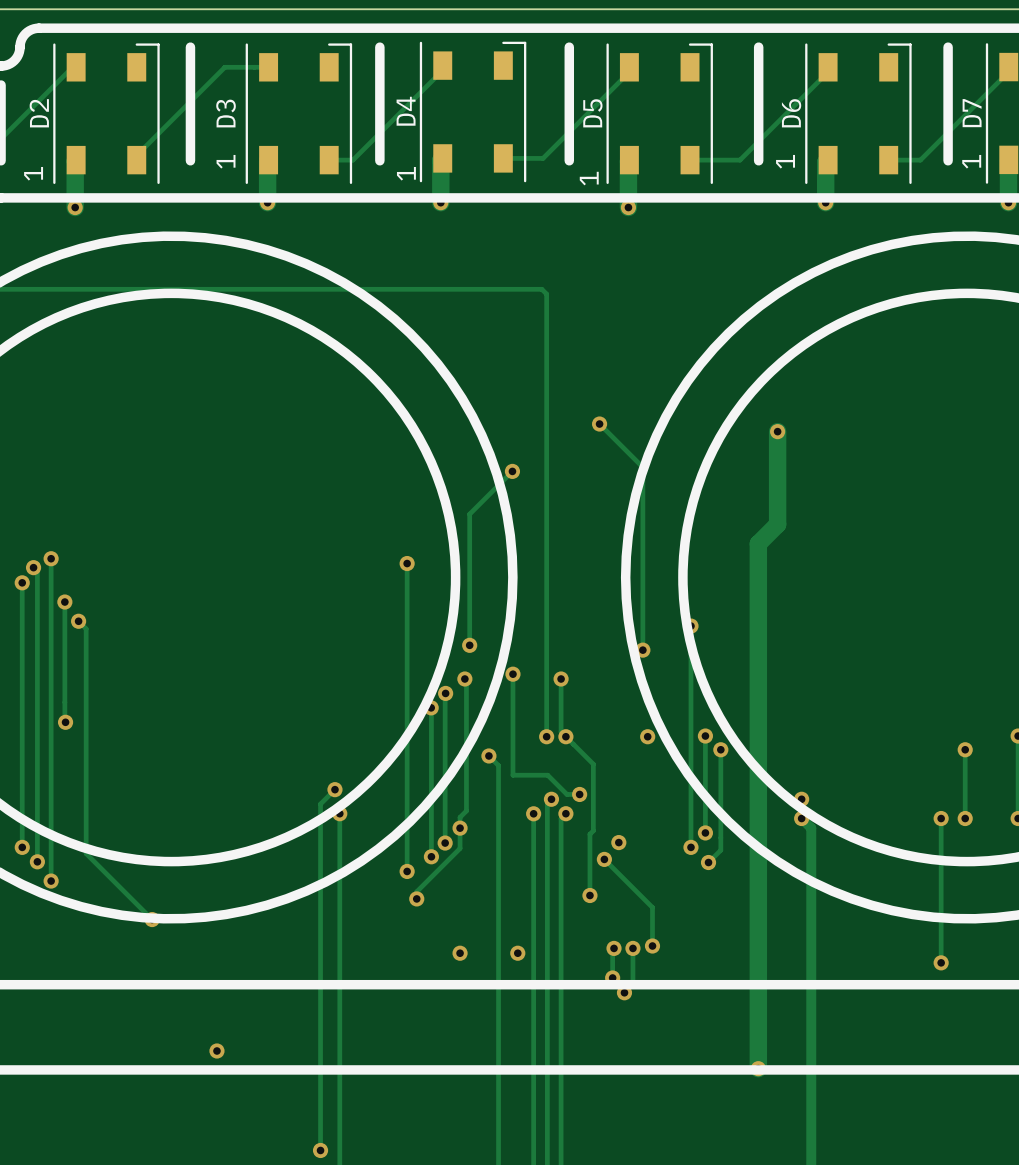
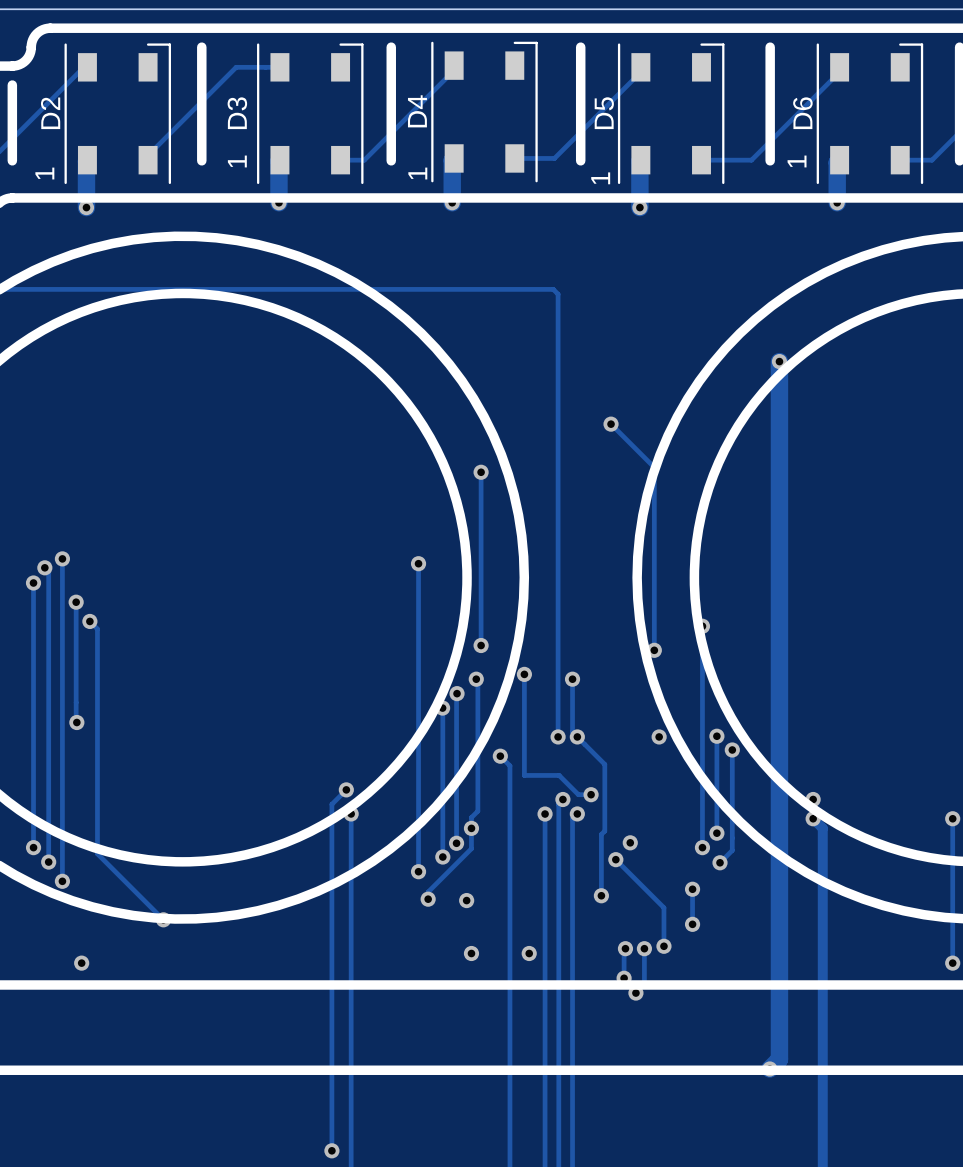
track: (777, 431) (777, 524) (758, 543) (758, 1068) -> (779, 361) (779, 1059) (769, 1069)
via position: (777, 431) -> (779, 361)
track: (512, 471) (469, 514) -> (481, 472) (481, 514)
via position: (512, 471) -> (481, 472)
track: none -> (692, 889) (692, 924)
via: none -> (692, 889)
via: none -> (466, 900)
via: none -> (692, 924)
via: none -> (81, 963)
via: (216, 1051) -> none

